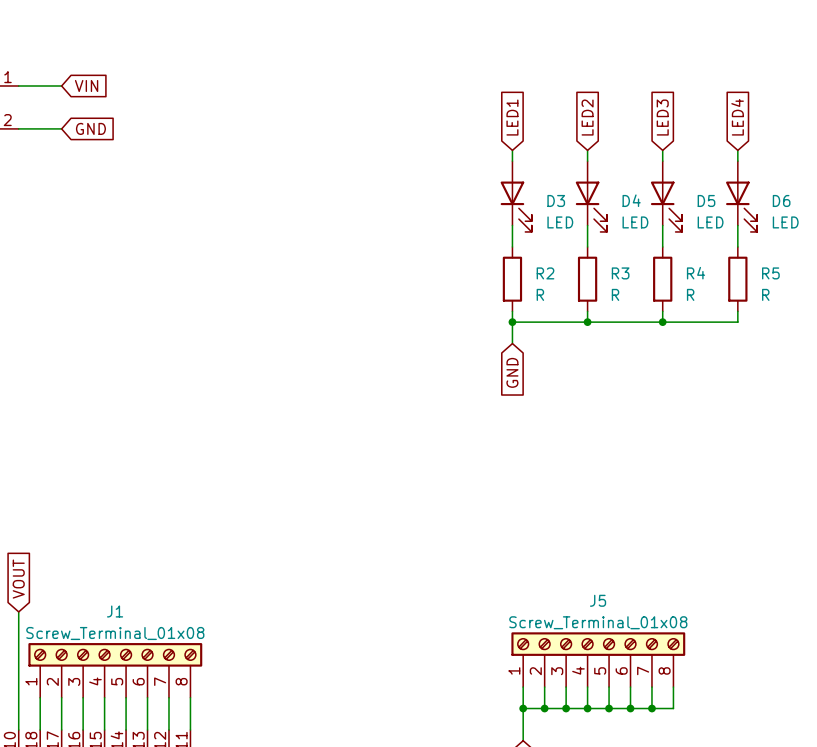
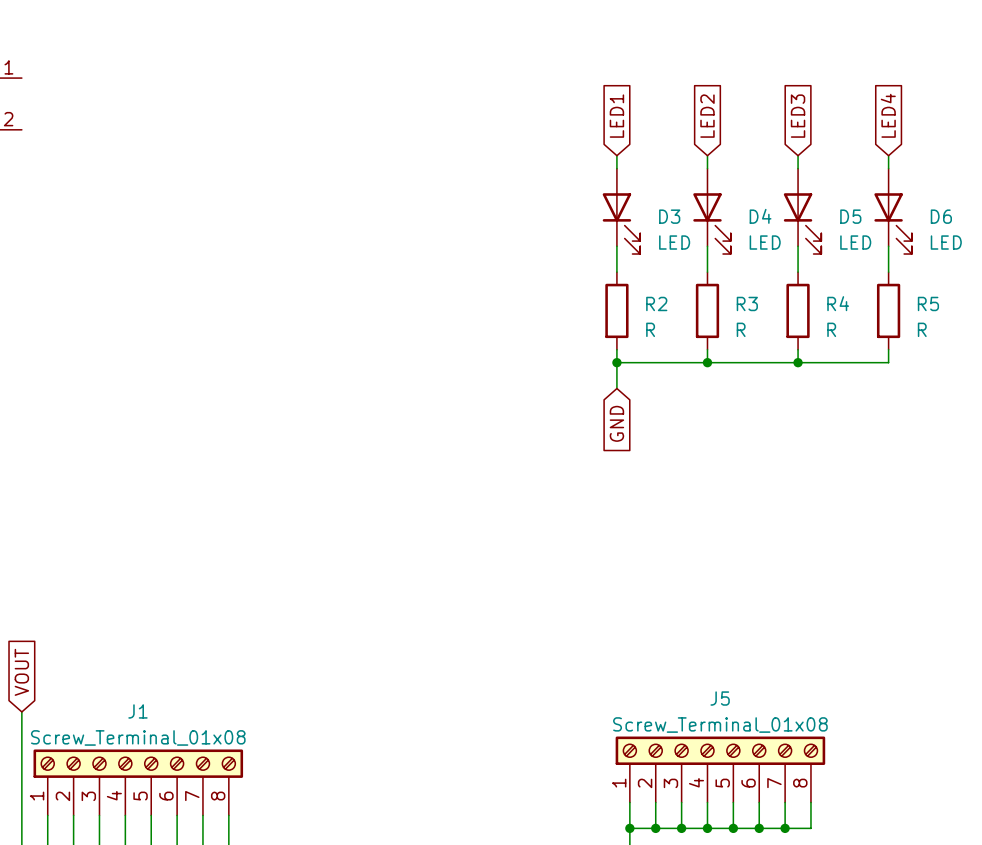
wire: (18, 85) (61, 85) -> none
global label: VIN (86, 85) -> none
wire: (18, 128) (61, 128) -> none
global label: GND (90, 128) -> none

